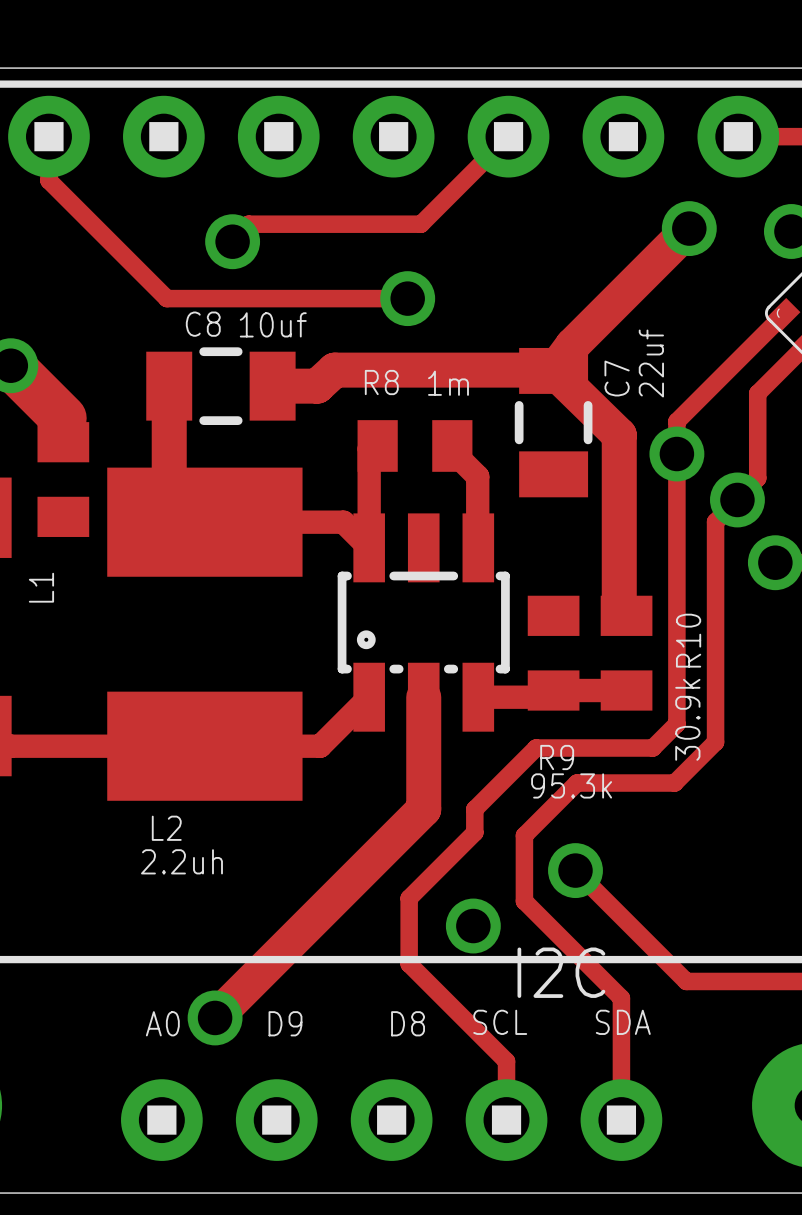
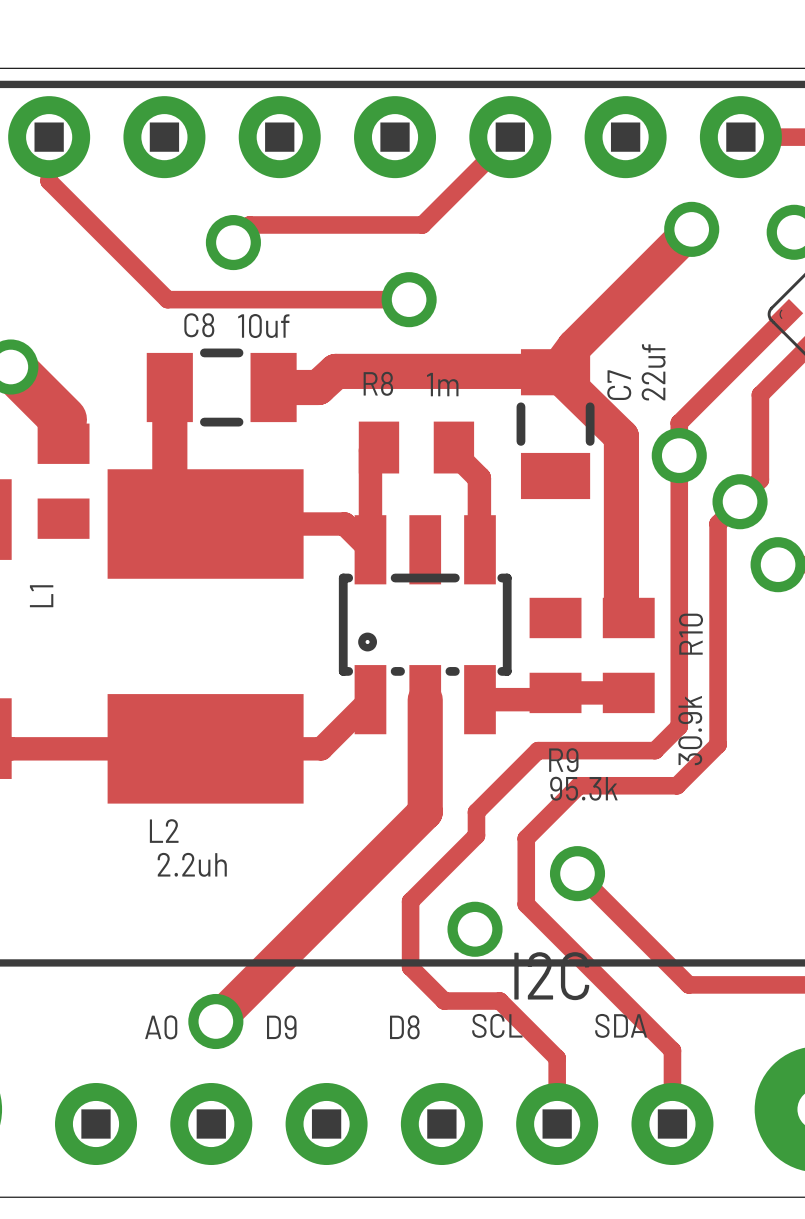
track: (442, 997) (506, 1061) (506, 1120) -> (444, 1001) (499, 1001) (557, 1058) (557, 1124)
track: (621, 998) (621, 1120) -> (623, 1001) (672, 1050) (672, 1124)
part footprint: [121, 1079, 663, 1161] -> [55, 1083, 714, 1166]

